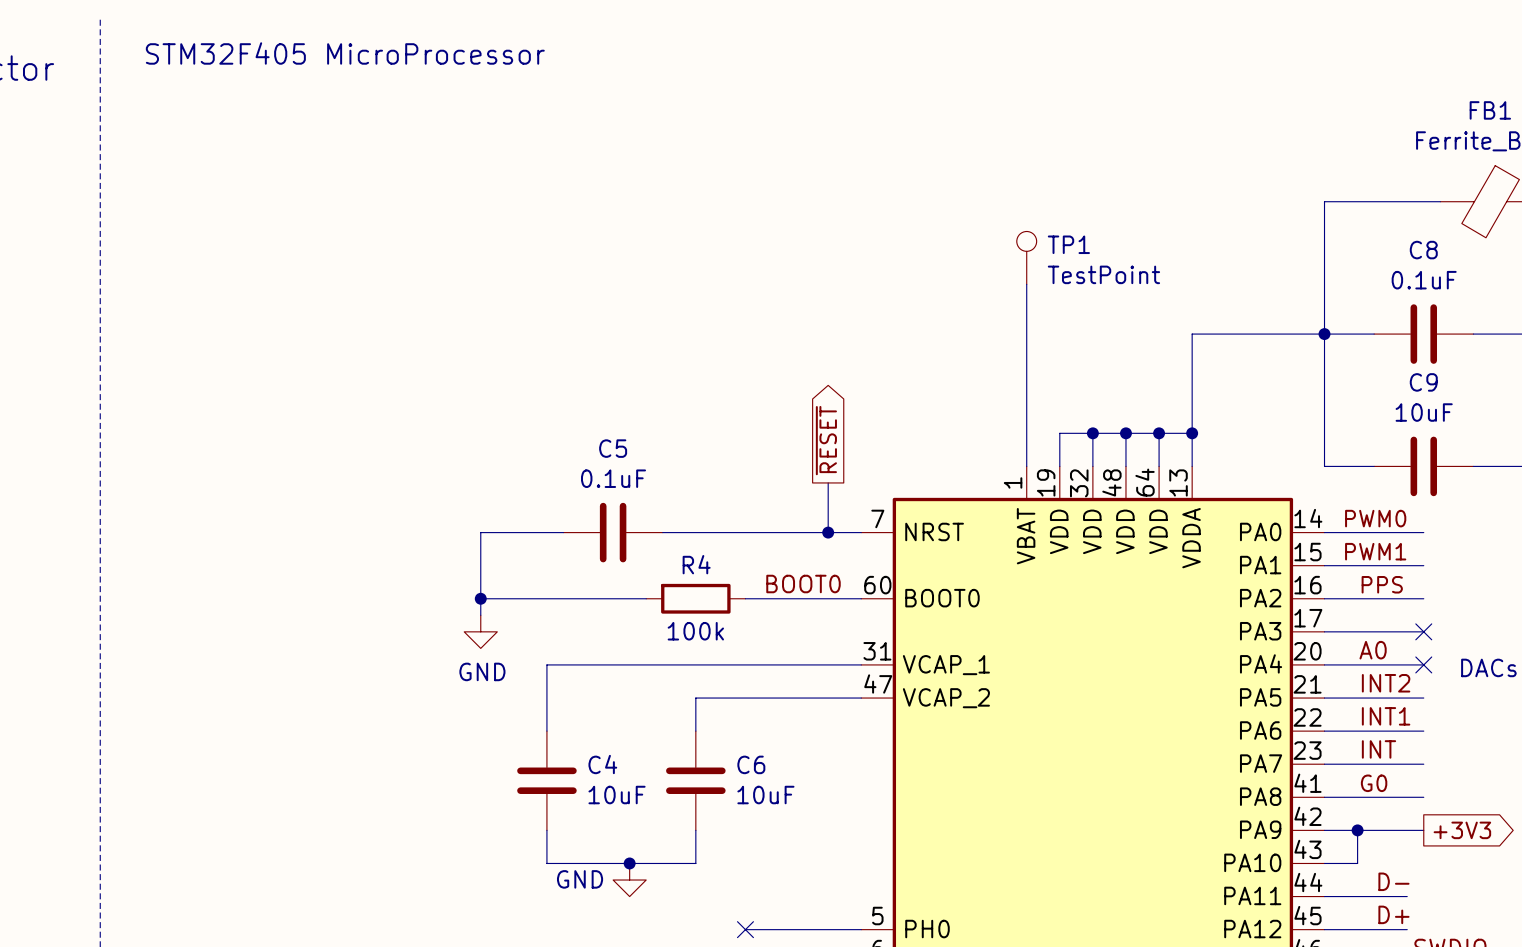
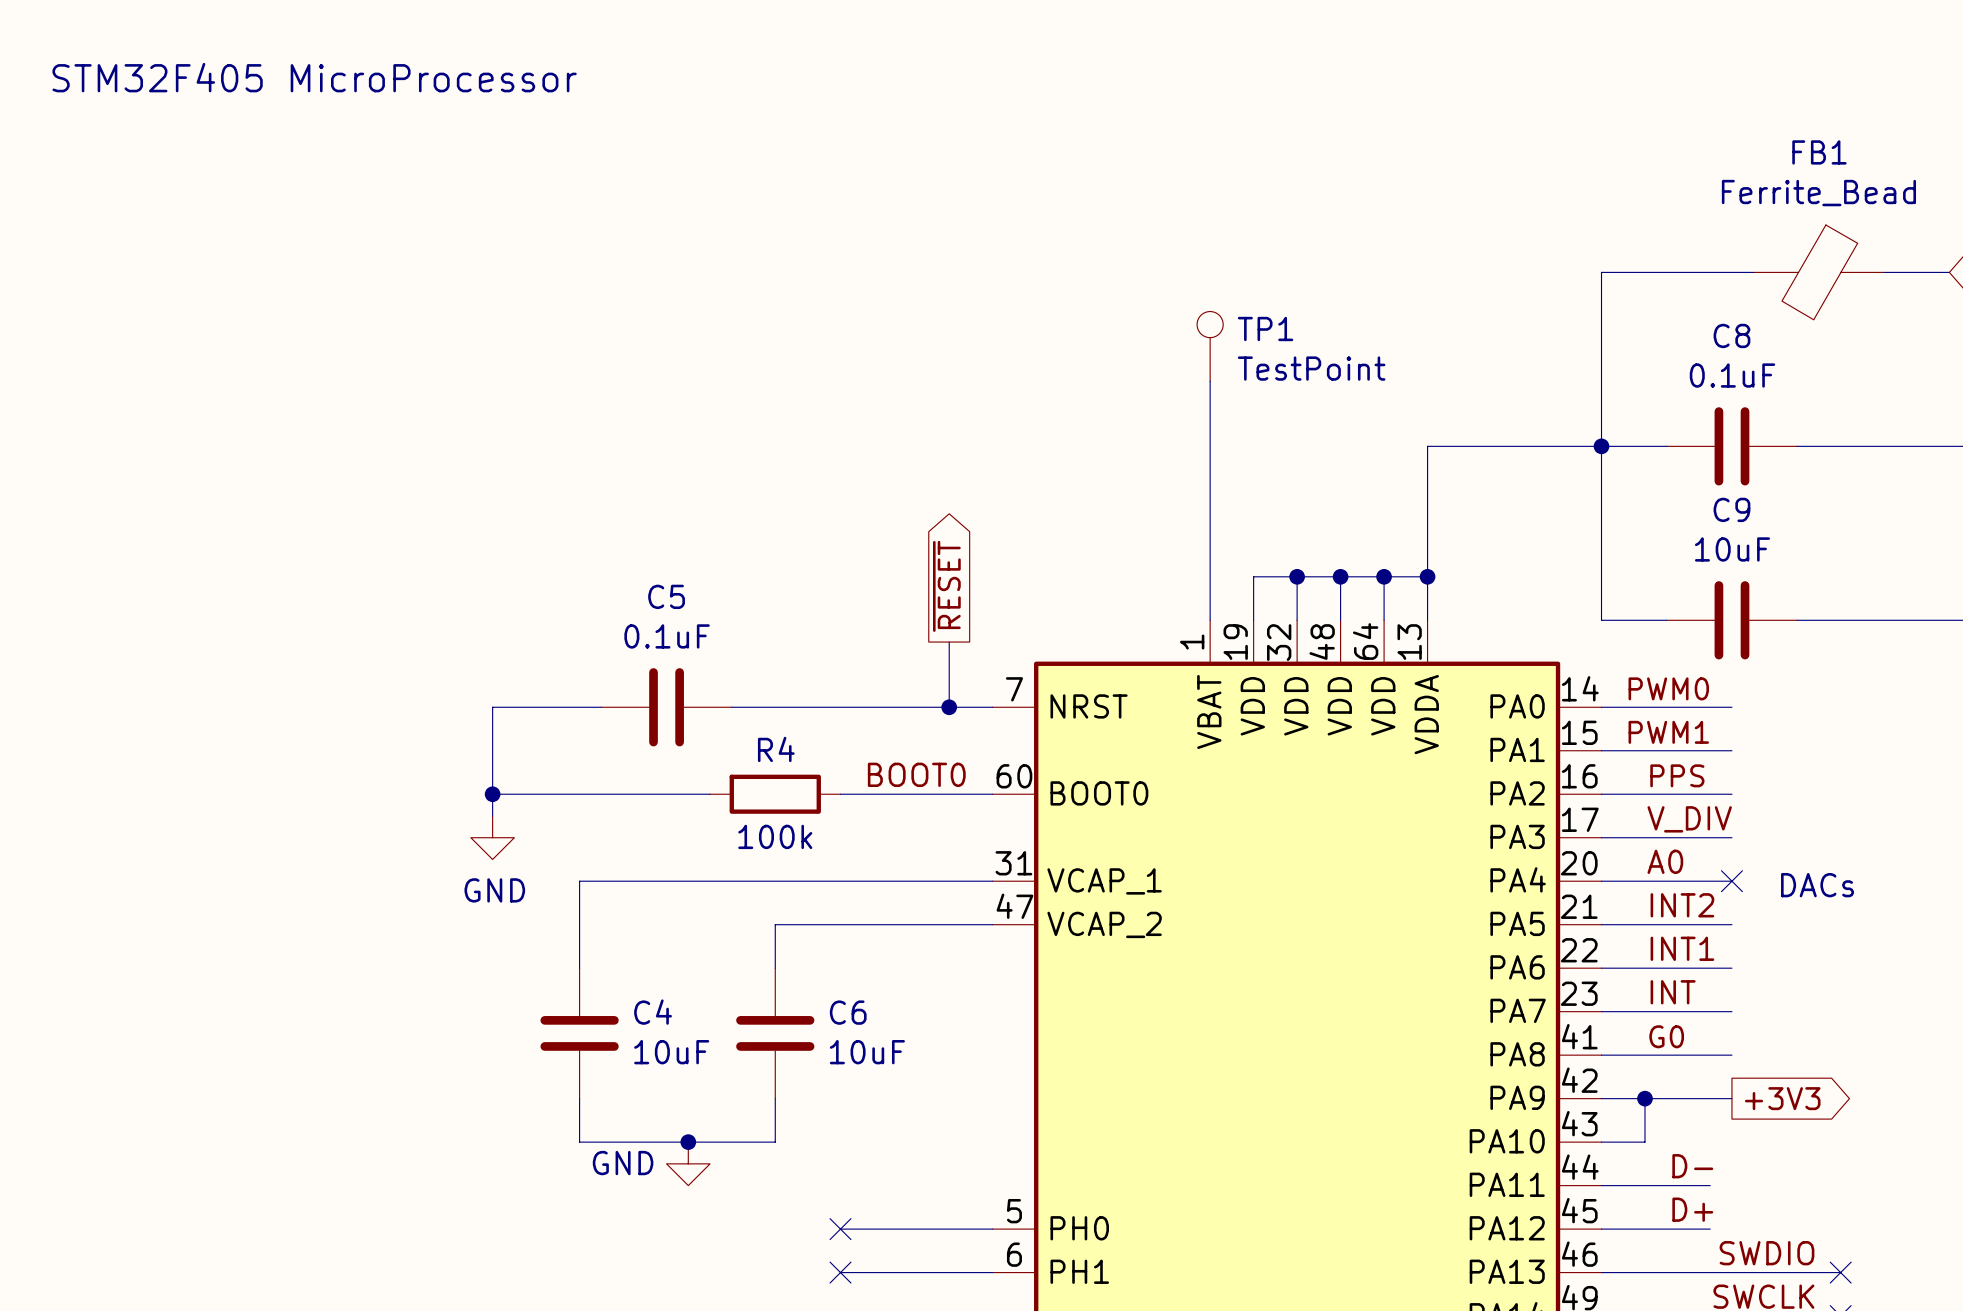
label: none -> V_DIV (1689, 819)
no-connect mark: (1423, 631) -> none

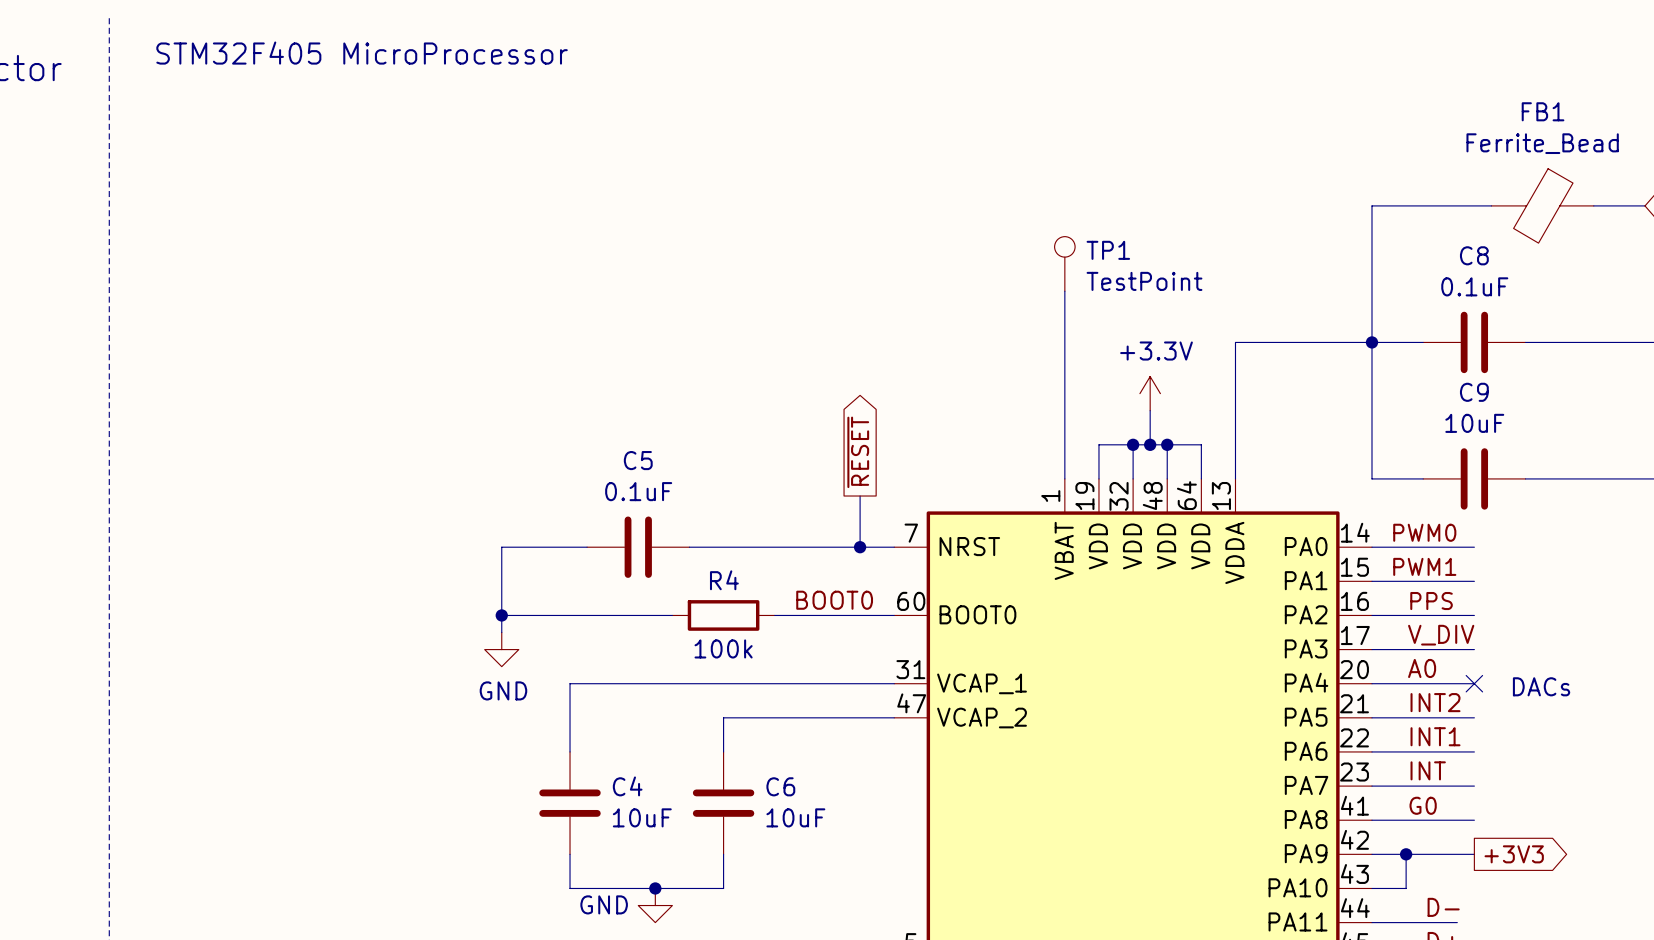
power symbol: none -> +3.3V (1150, 393)
wire: none -> (1150, 410) (1150, 444)
junction: none -> (1150, 444)
wire: (1384, 576) (1427, 576) -> none
junction: (1384, 576) -> none
junction: (1427, 576) -> none

